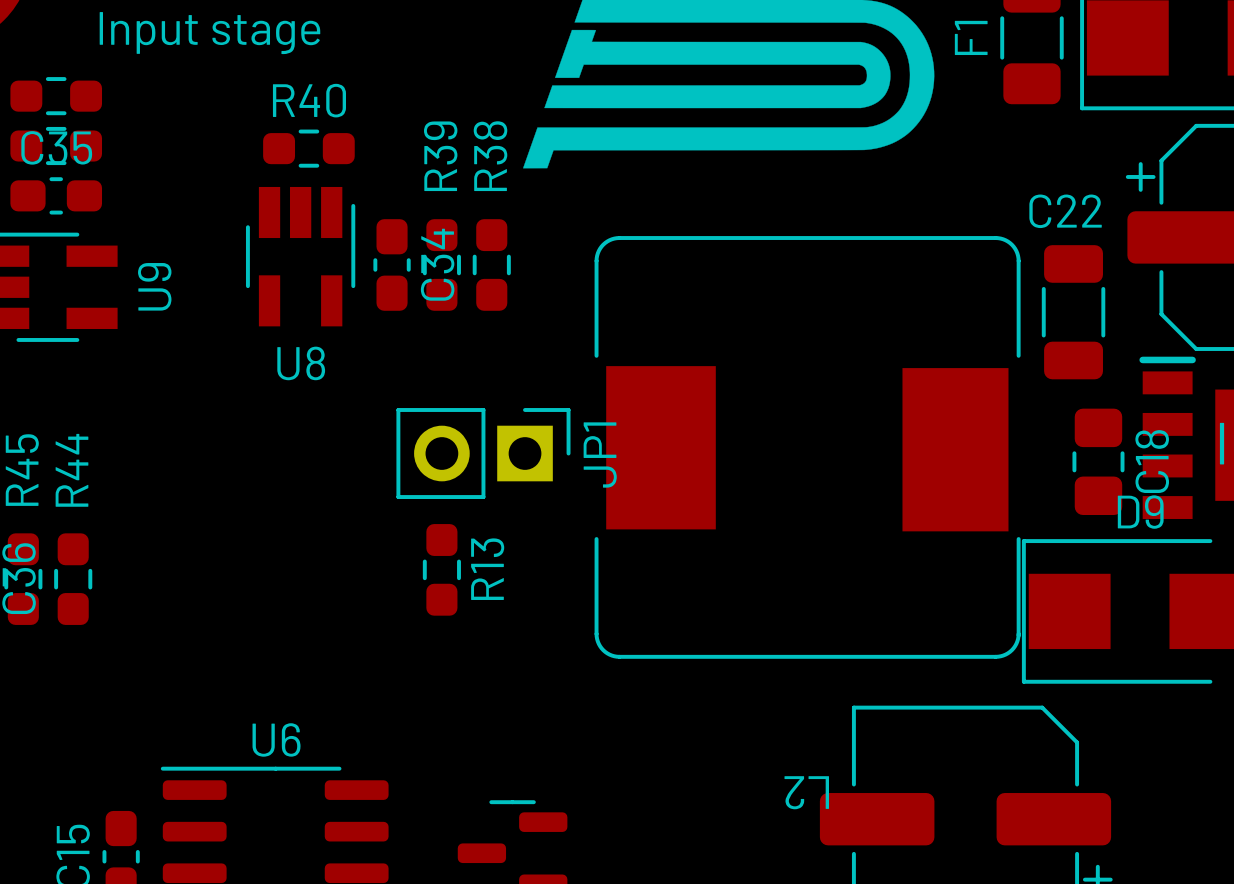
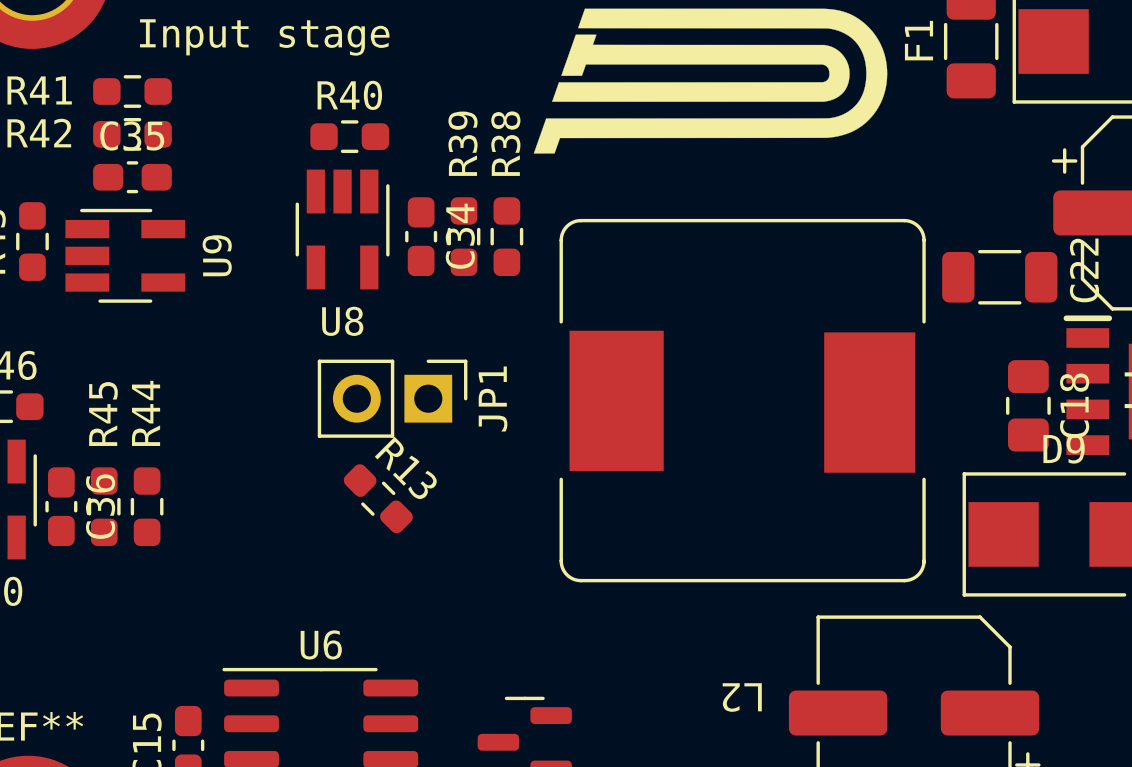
C22 rotation: 0° (1073, 312) -> 90° clockwise (999, 277)
L2 position: (807, 447) -> (742, 400)
JP1 position: (483, 453) -> (392, 398)
R13 rotation: 0° (441, 569) -> 45° counterclockwise (378, 498)
R13 position: (441, 569) -> (378, 498)

